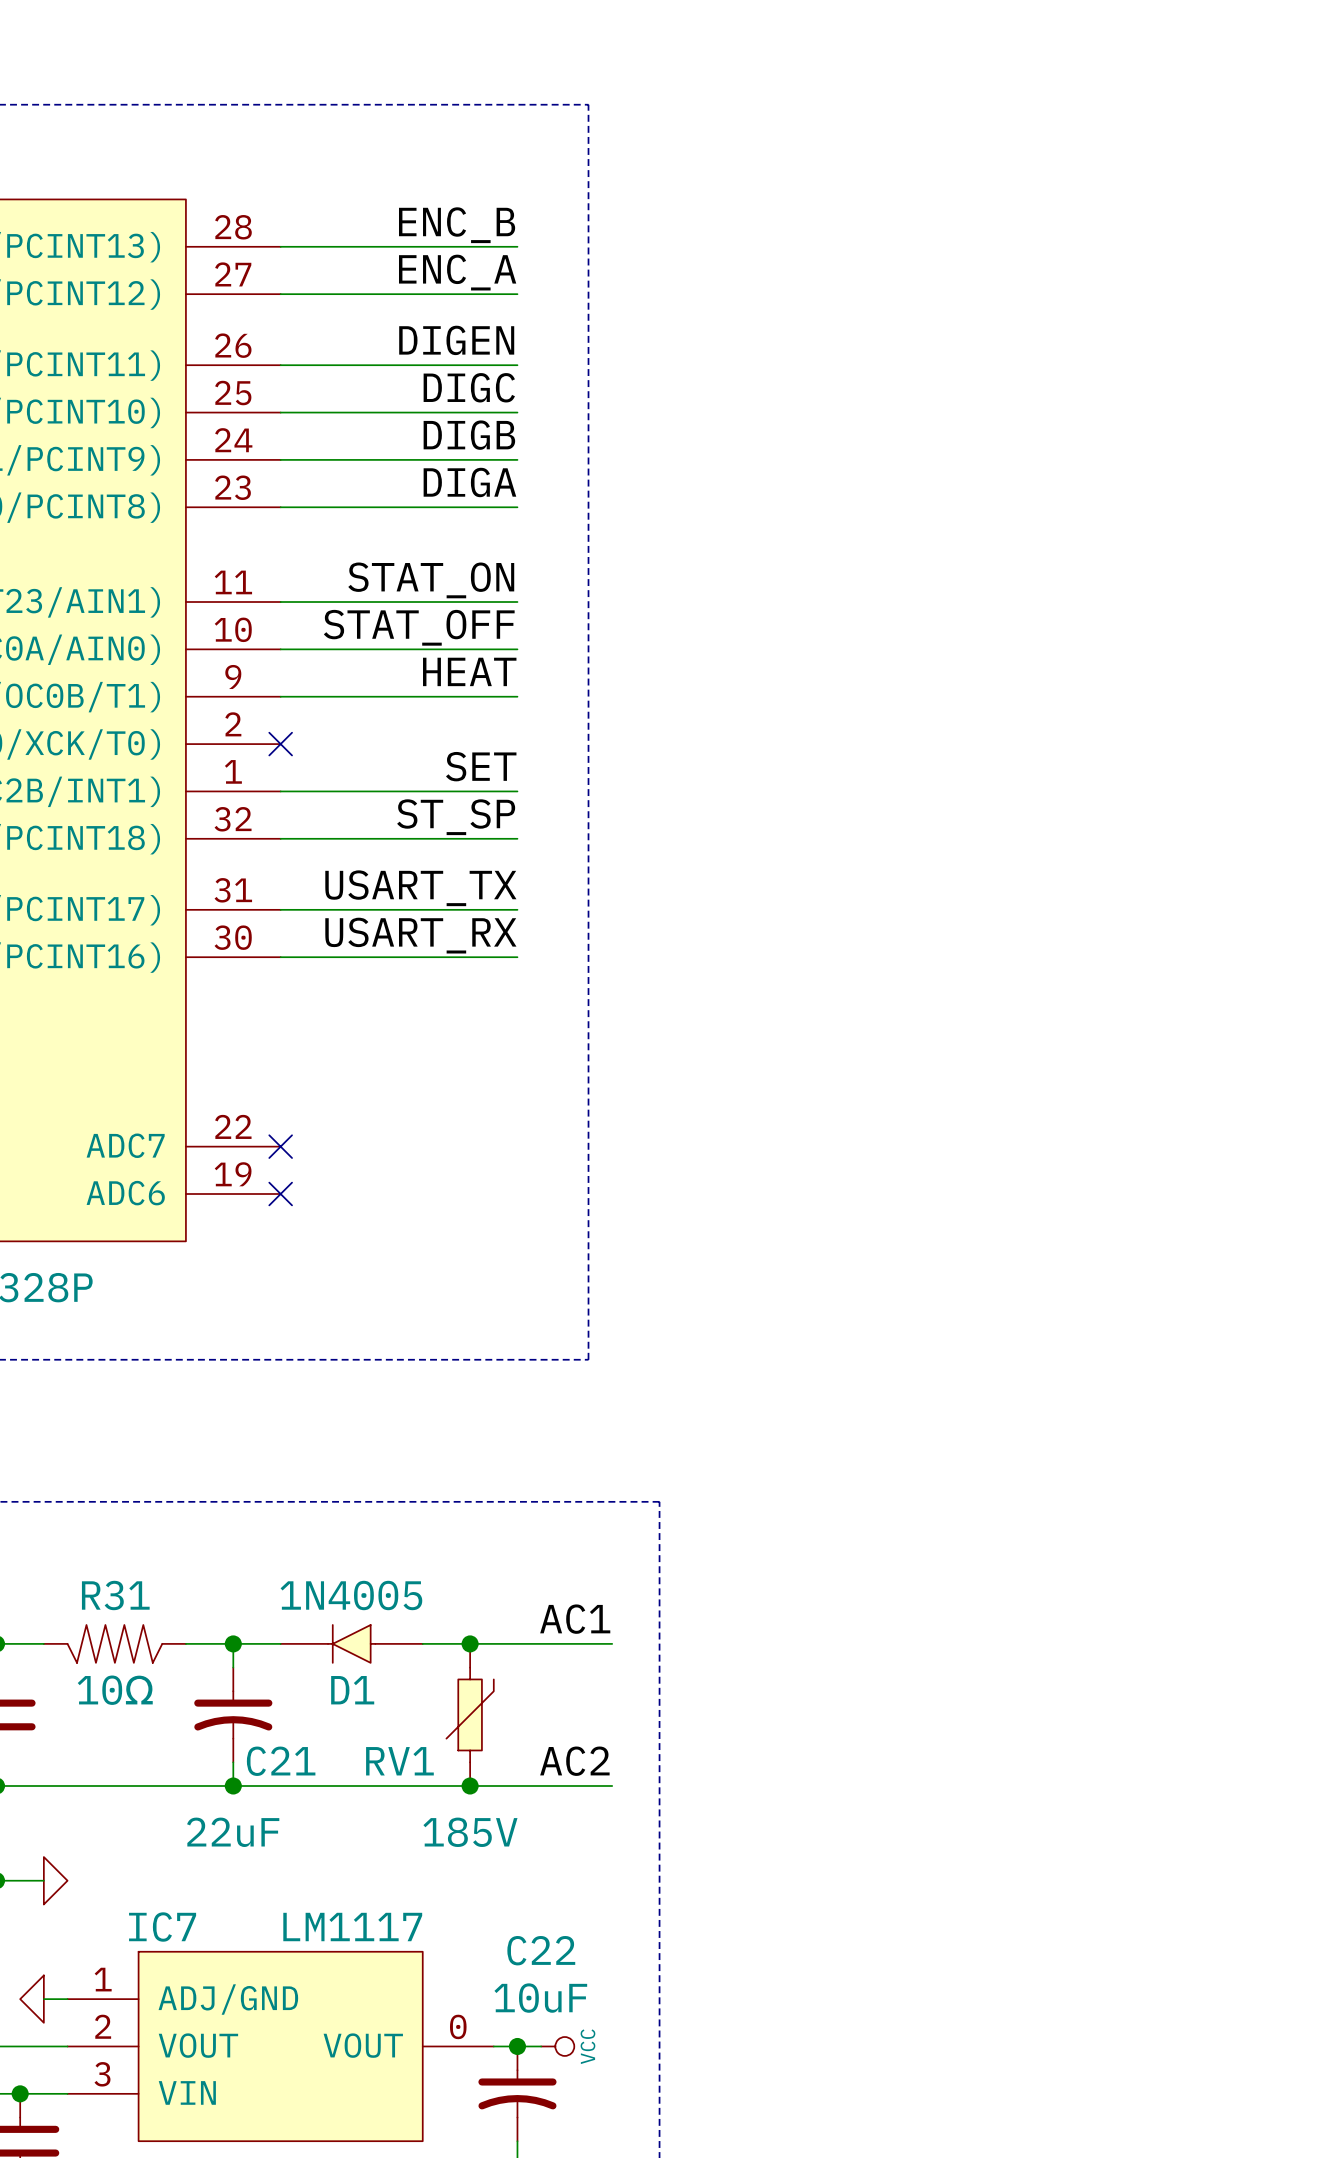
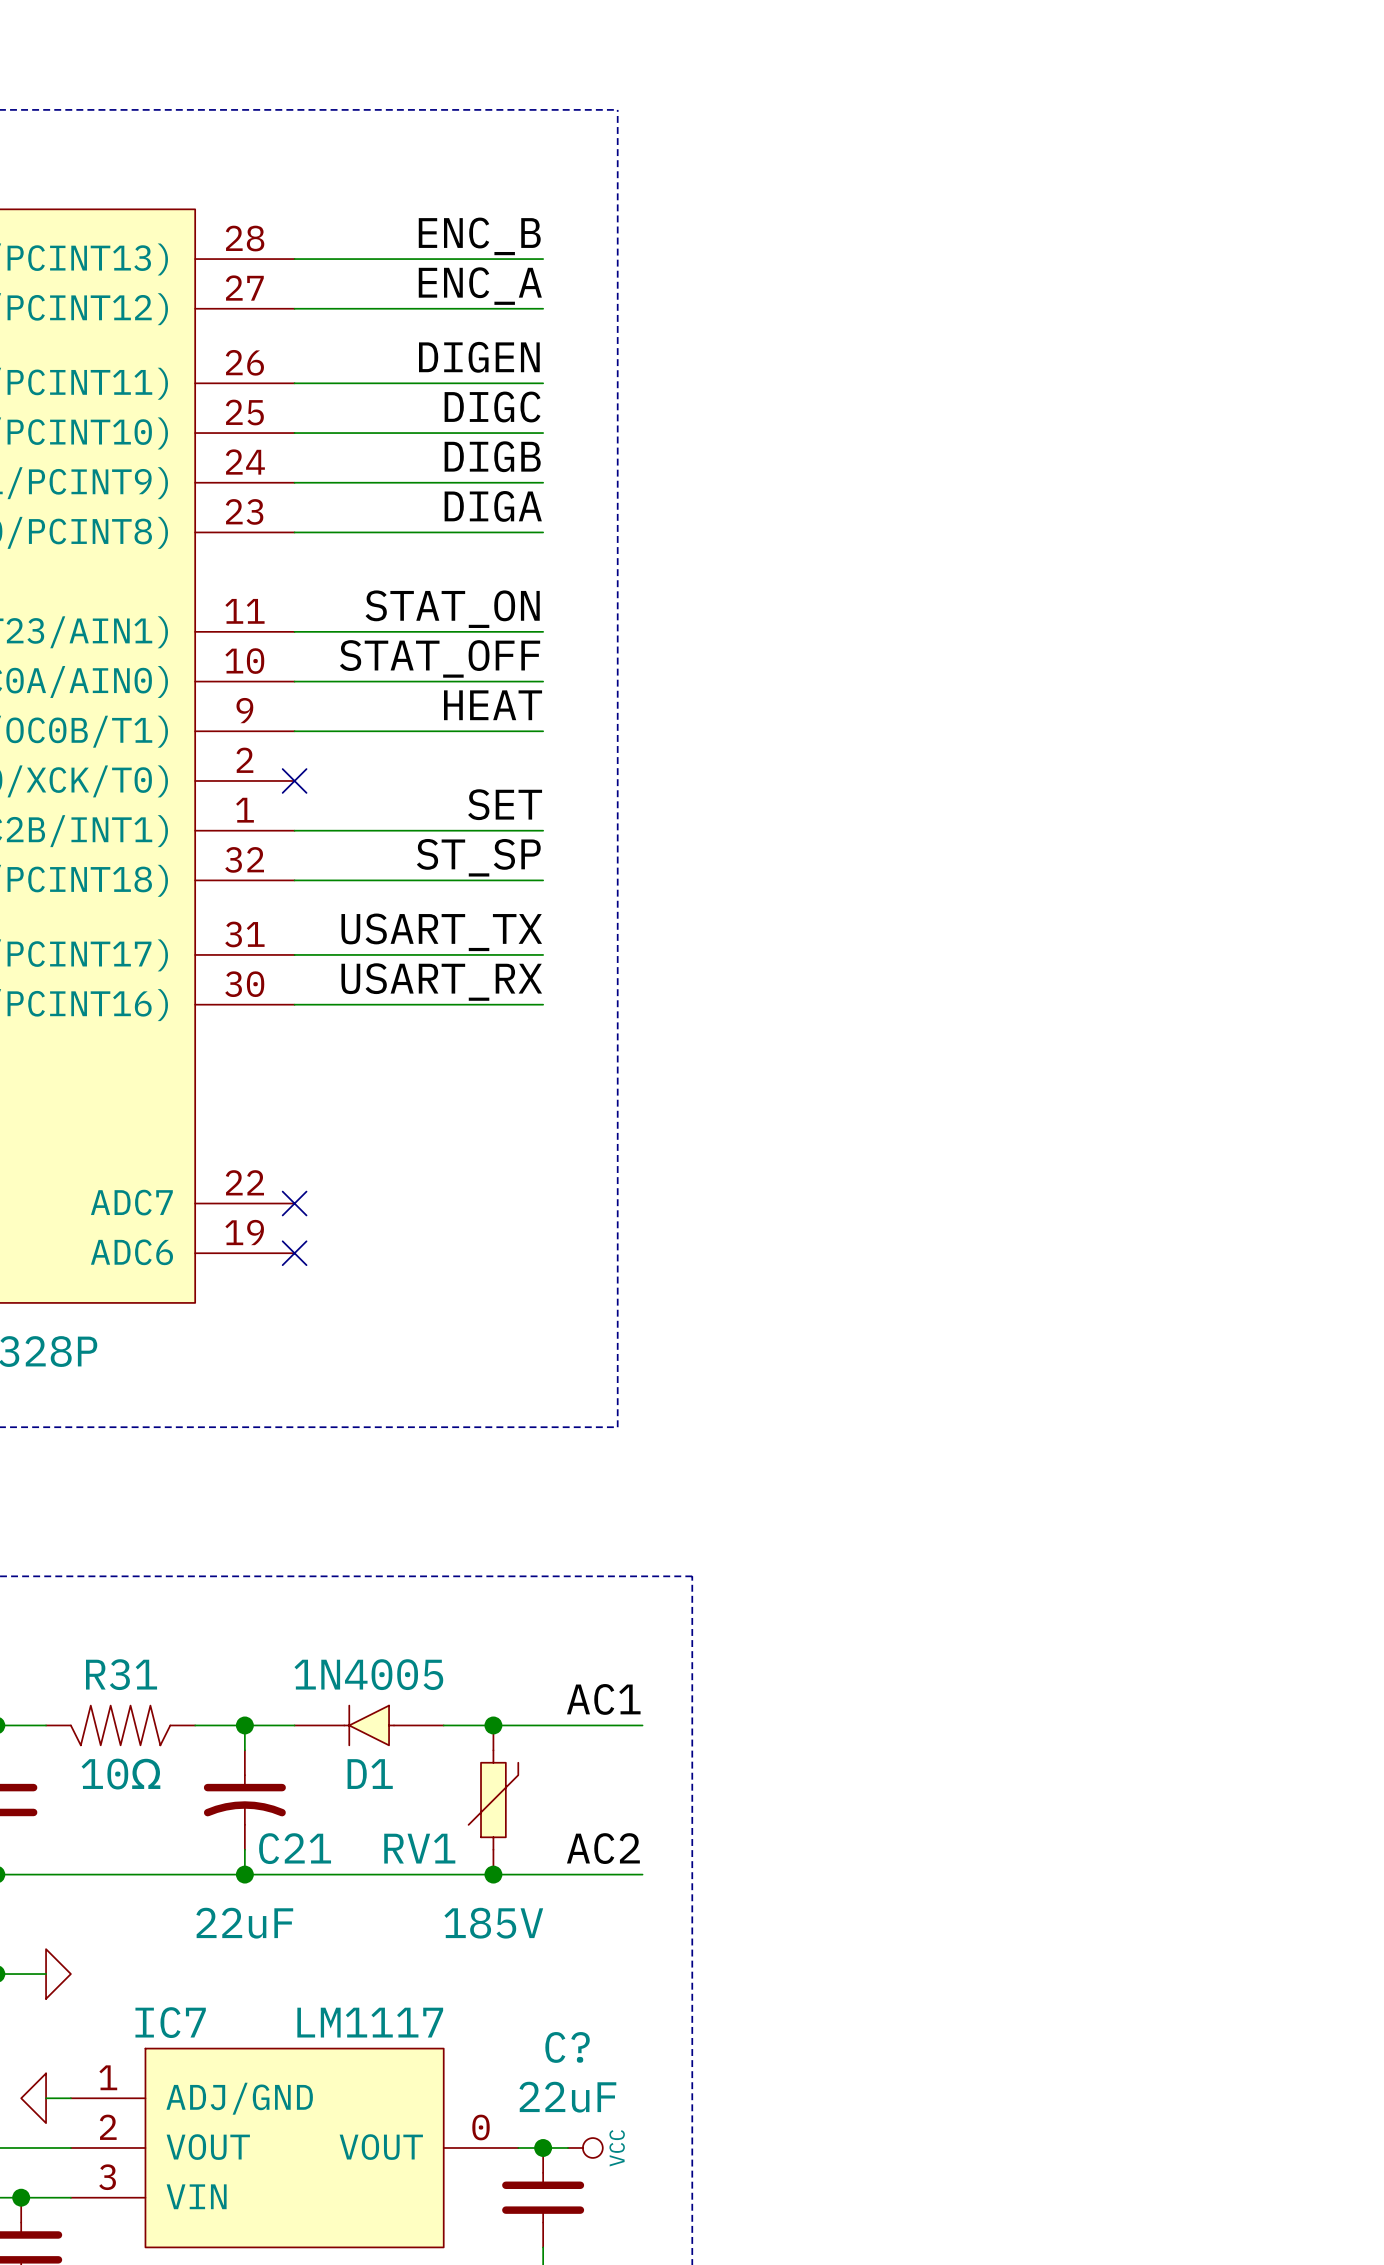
C22: 10uF (517, 2093) -> none
C?: none -> 22uF (543, 2197)

